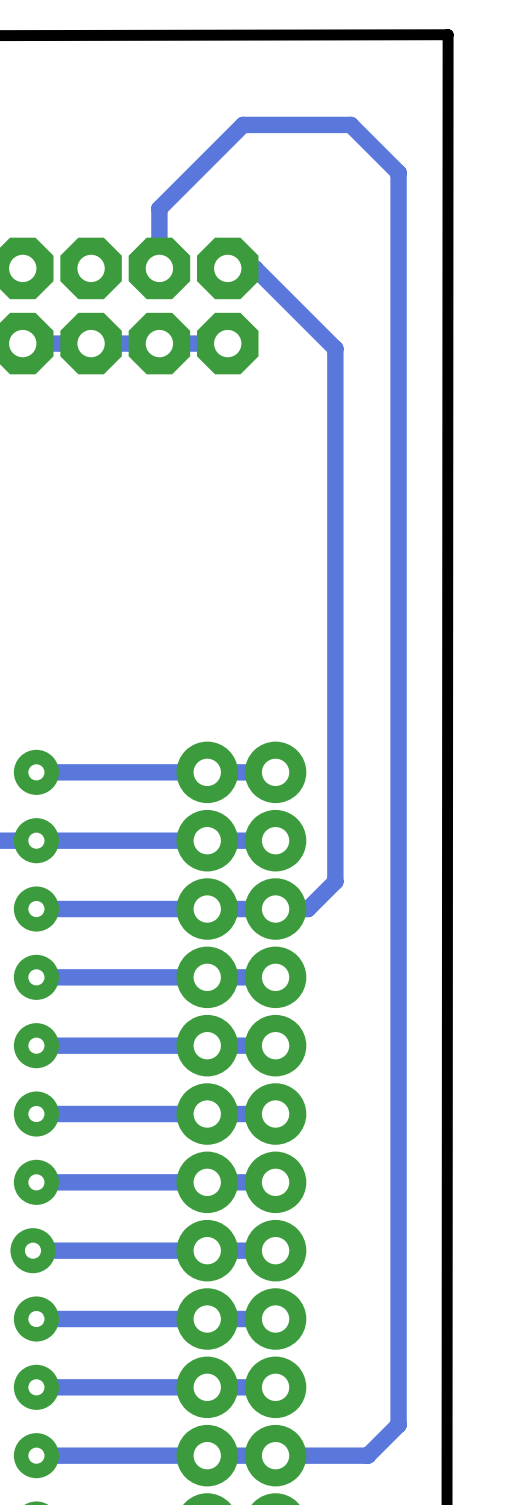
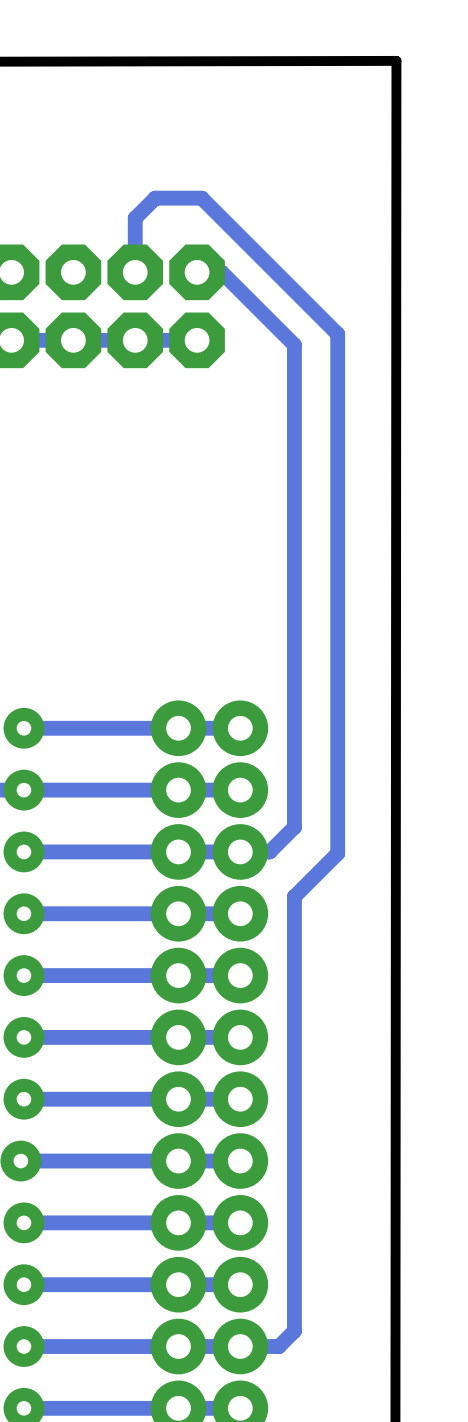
track: (181, 186) (243, 124) (350, 124) (398, 172) (398, 1424) (367, 1455) (318, 1455) -> (155, 198) (201, 198) (337, 334) (337, 853) (294, 896) (294, 1331) (278, 1346)

